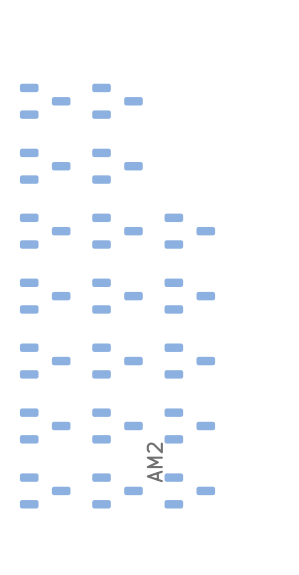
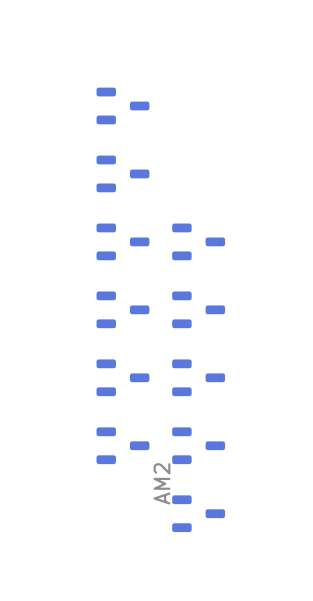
part: (45, 101) -> none
part: (45, 166) -> none
part: (45, 231) -> none
part: (45, 296) -> none
part: (45, 361) -> none
part: (45, 426) -> none
part: (45, 490) -> none
part: (117, 490) -> none

